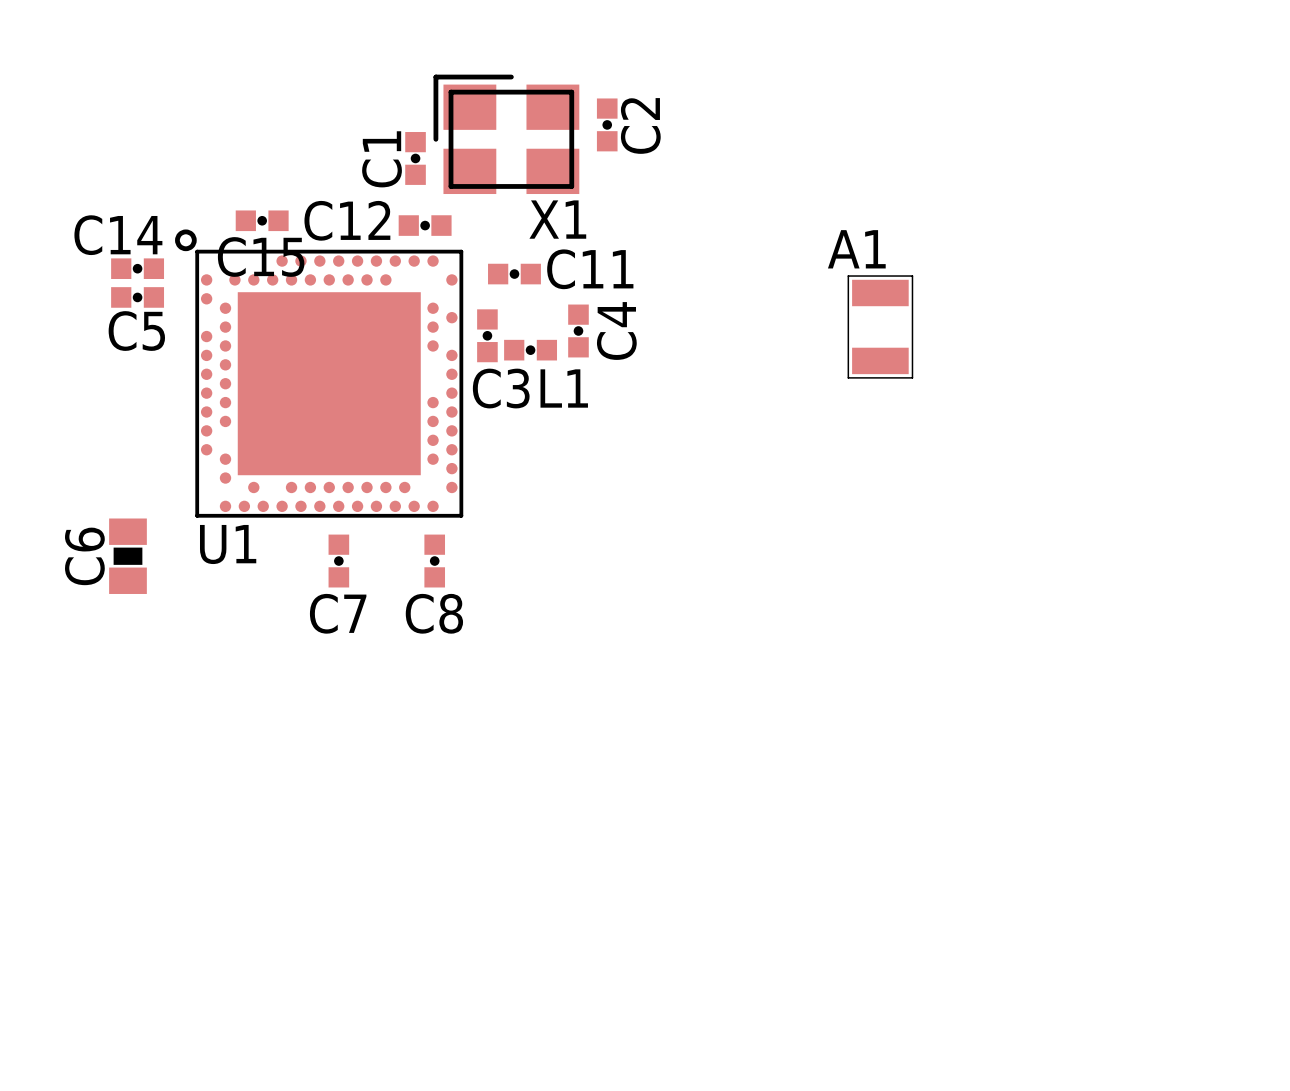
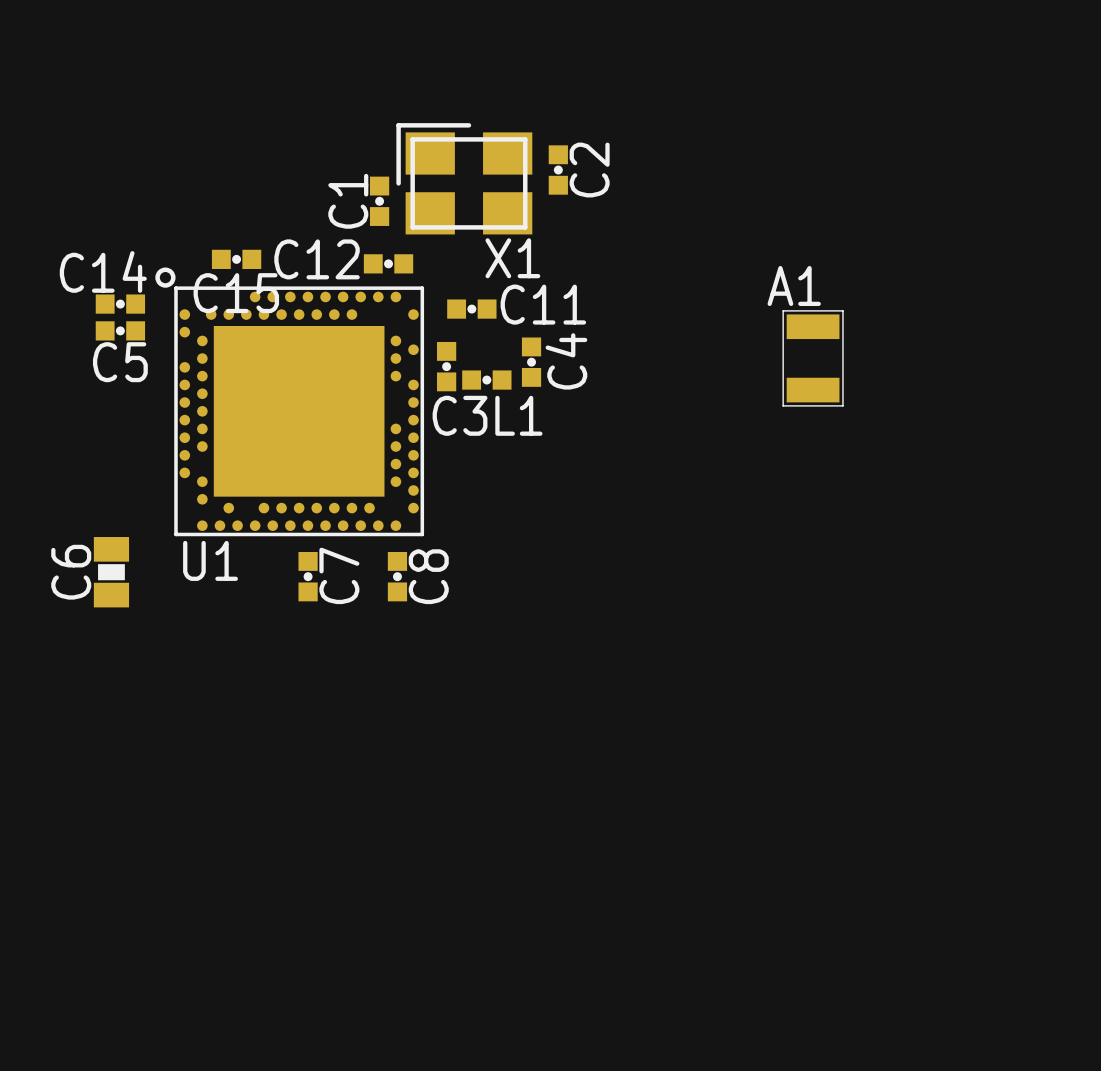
C7 name rotation: 0° (338, 613) -> 90° counterclockwise (339, 575)
C8 name rotation: 0° (434, 613) -> 90° counterclockwise (428, 576)

